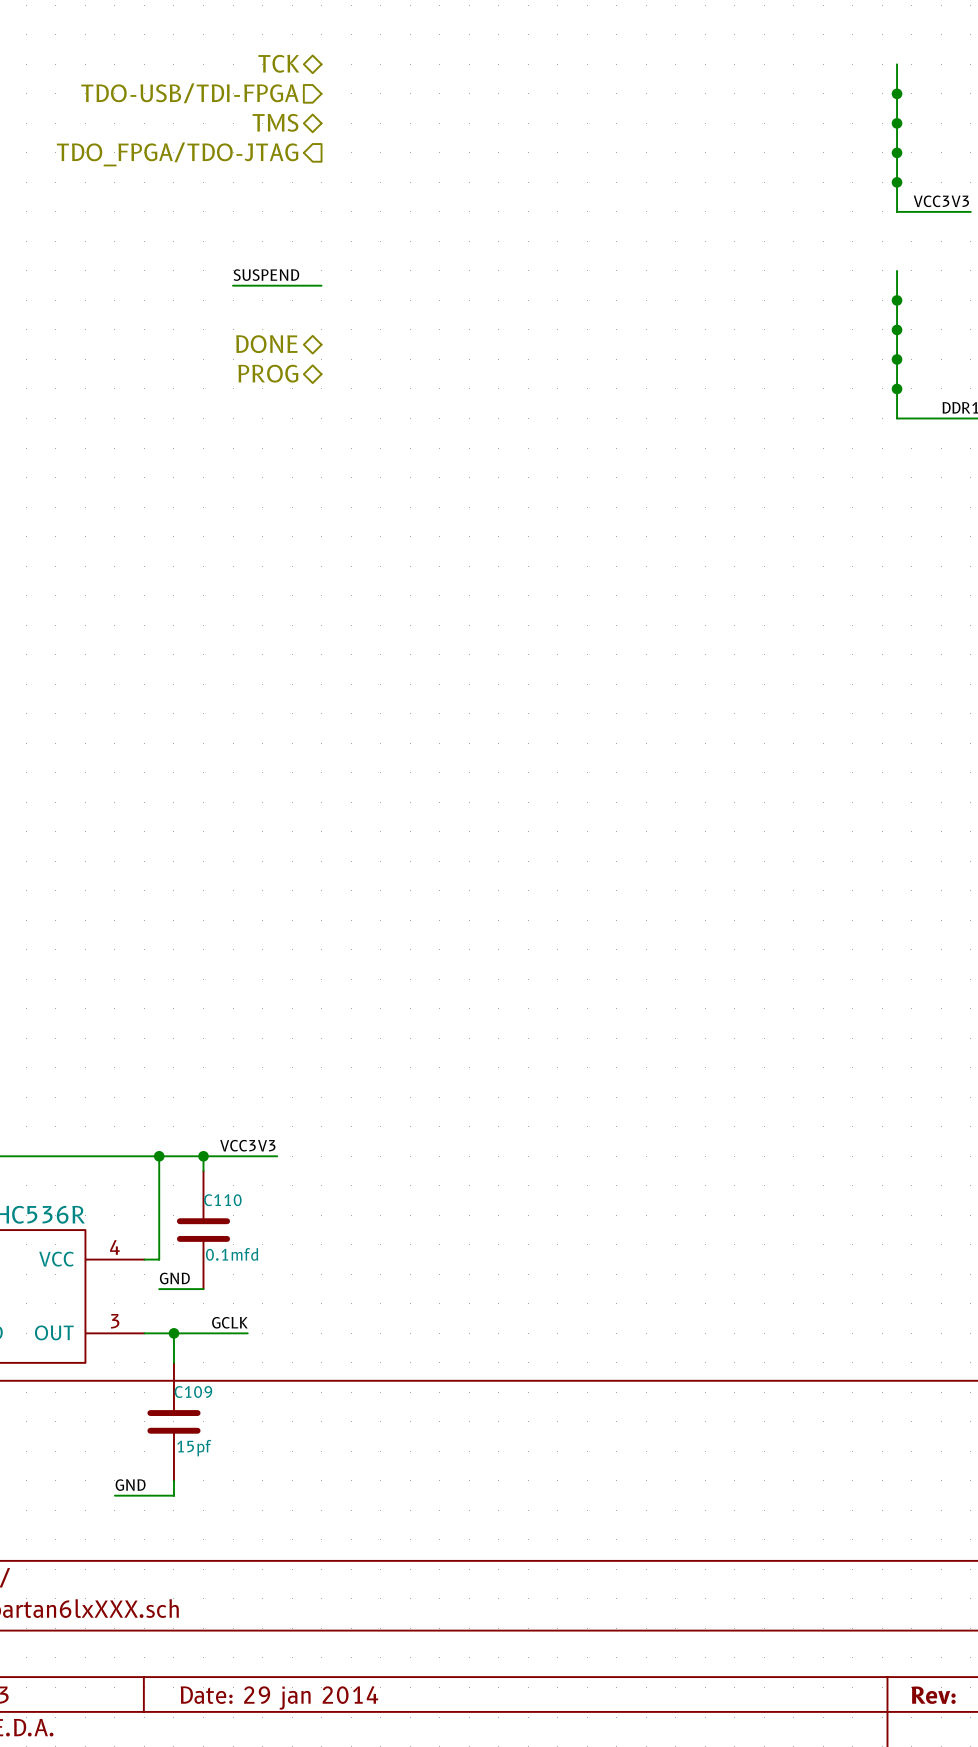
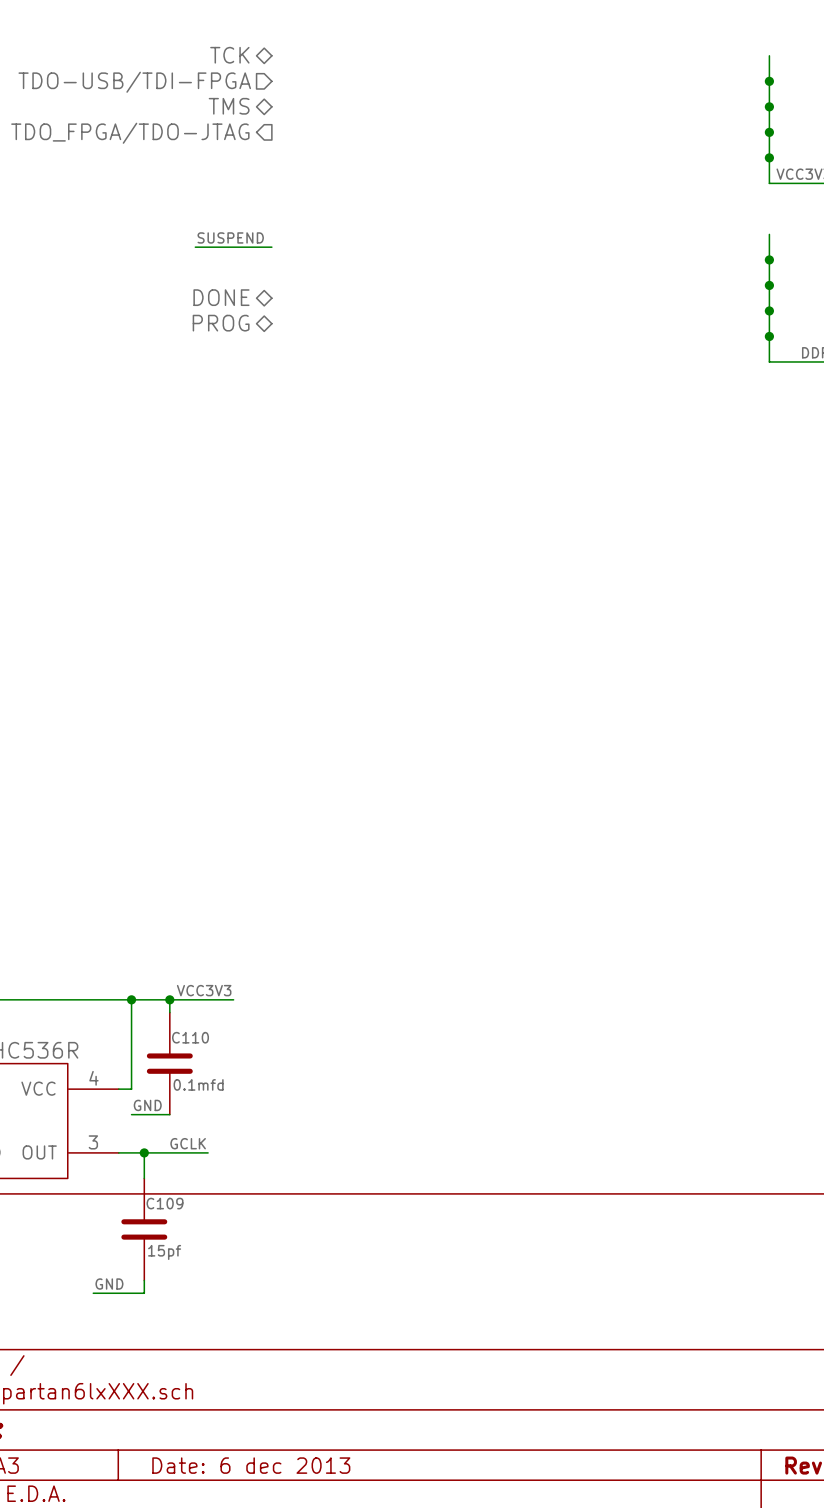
title block: Date: 29 jan 2014 (279, 1697) -> Date: 6 dec 2013 (251, 1465)

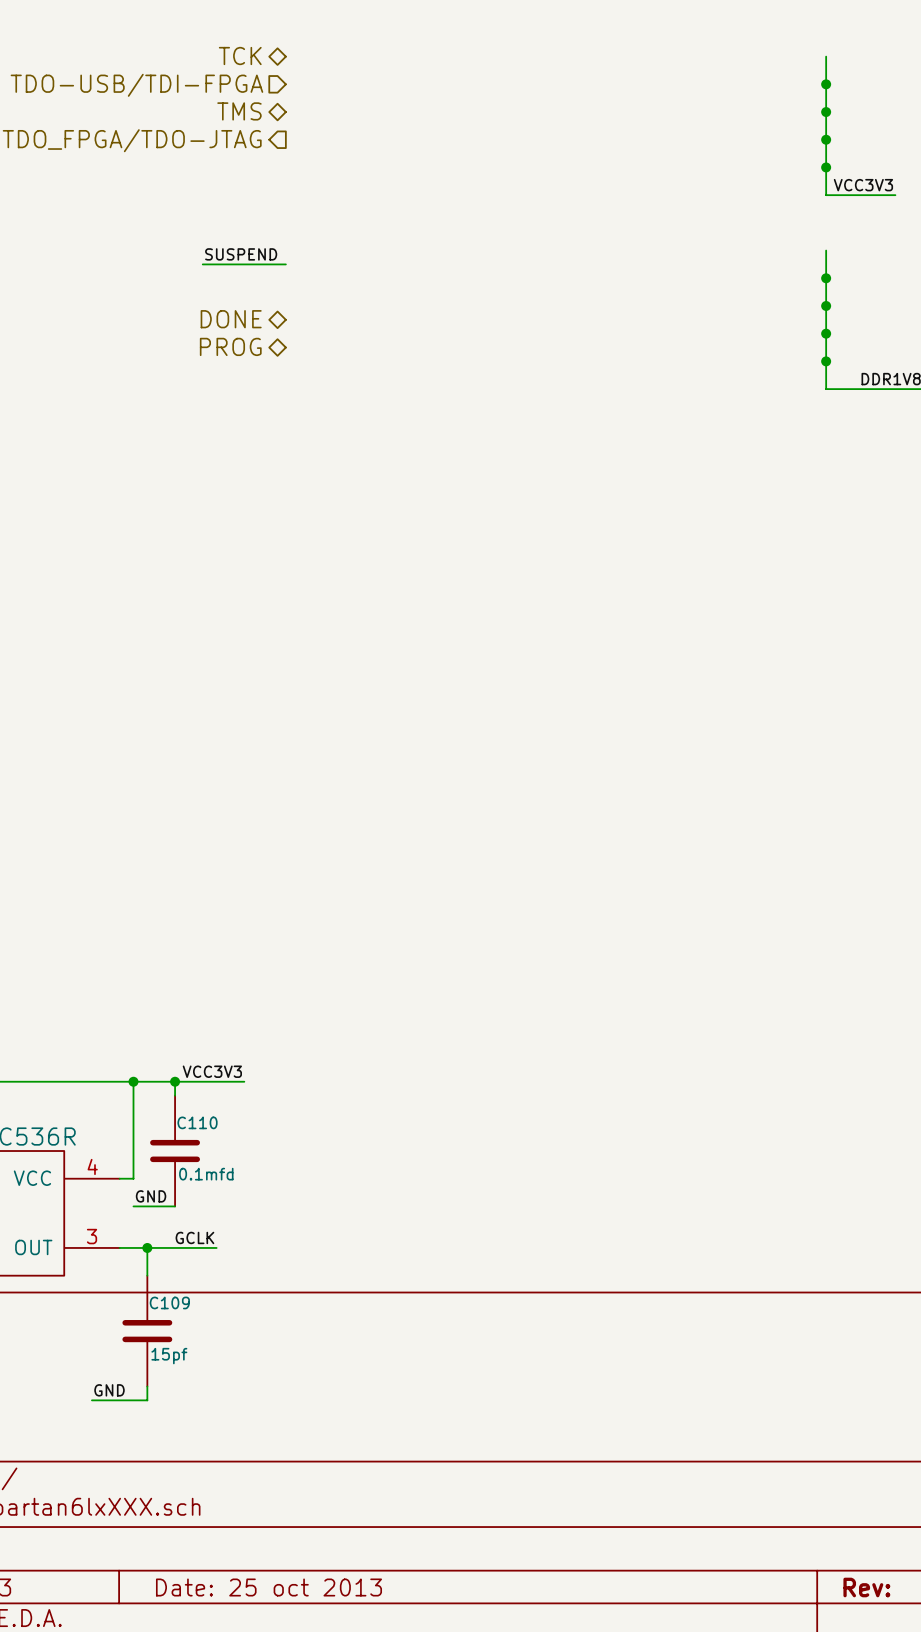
title block: Date: 6 dec 2013 (251, 1465) -> Date: 25 oct 2013 (268, 1587)

